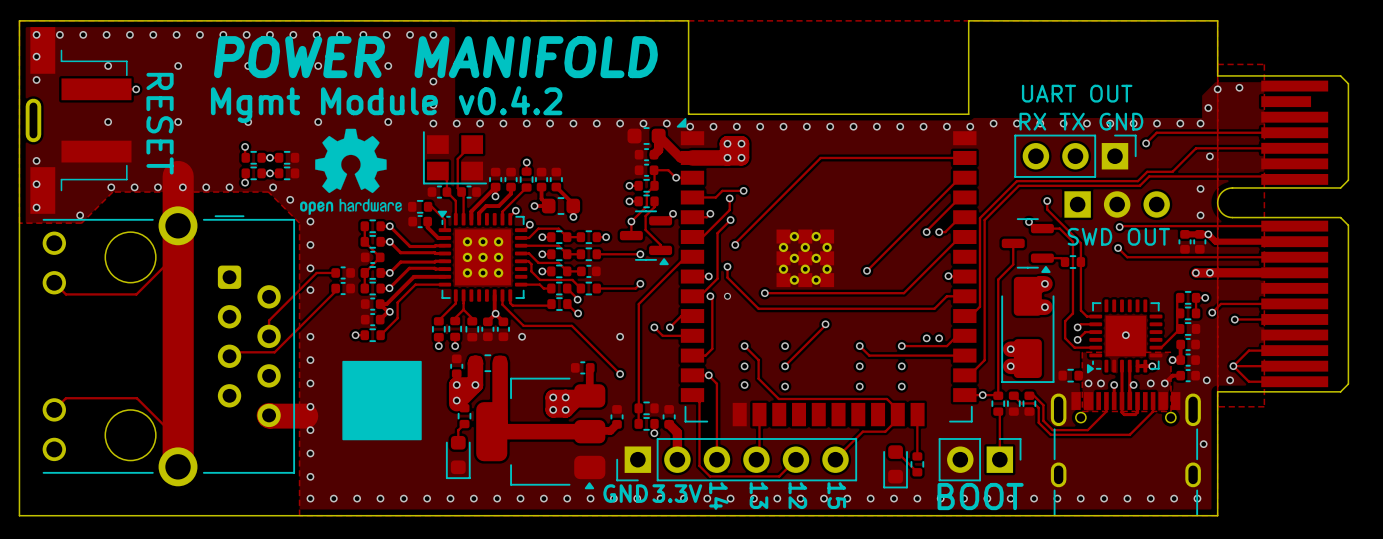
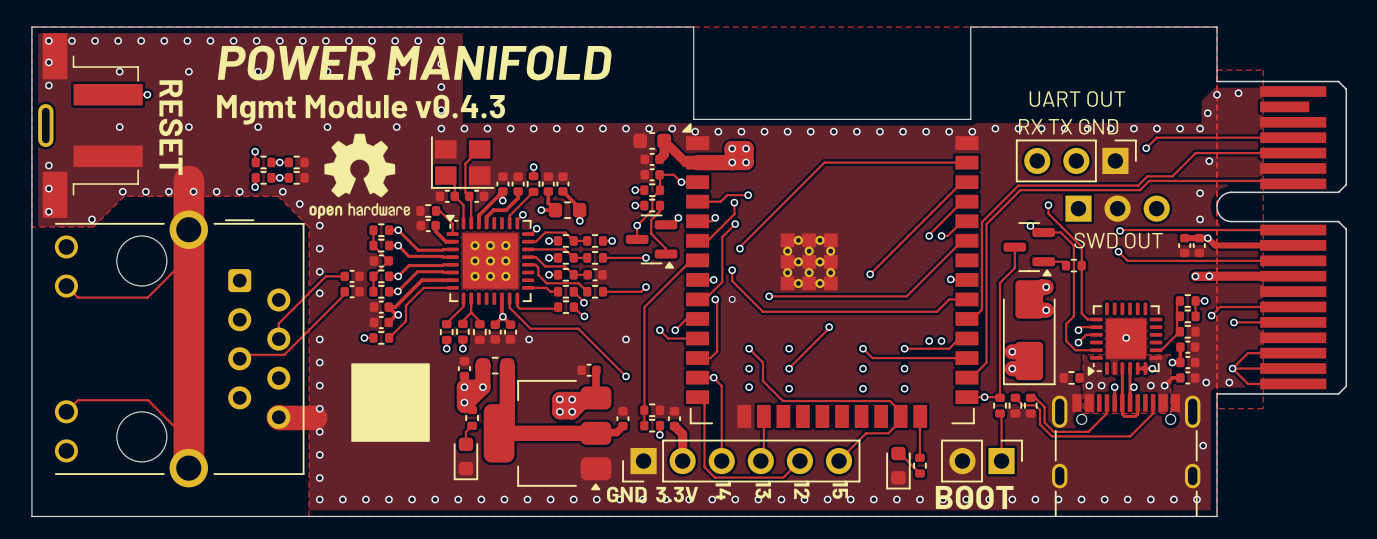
text: Mgmt Module v0.4.2 (386, 104) -> Mgmt Module v0.4.3 (361, 109)

